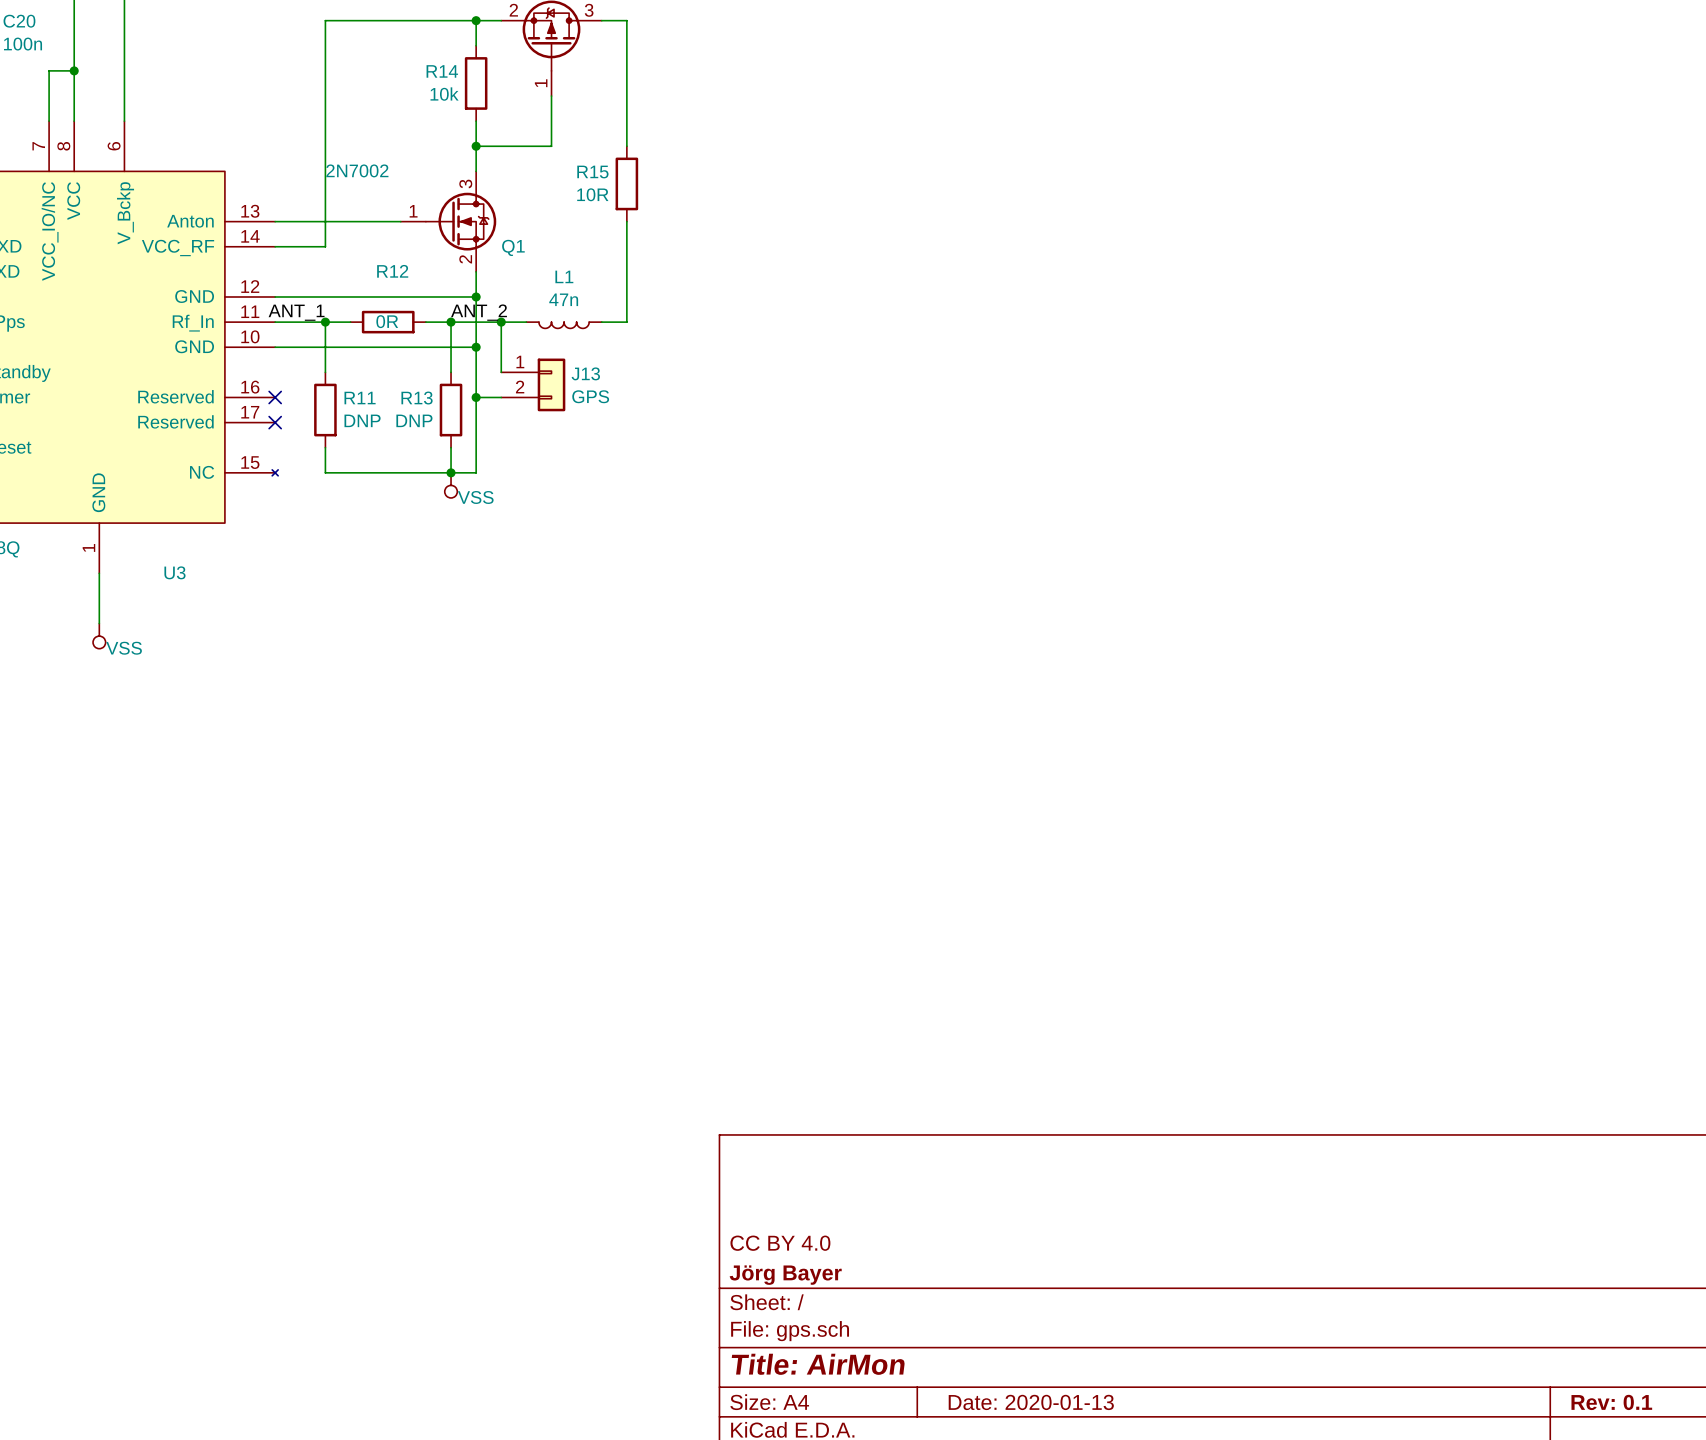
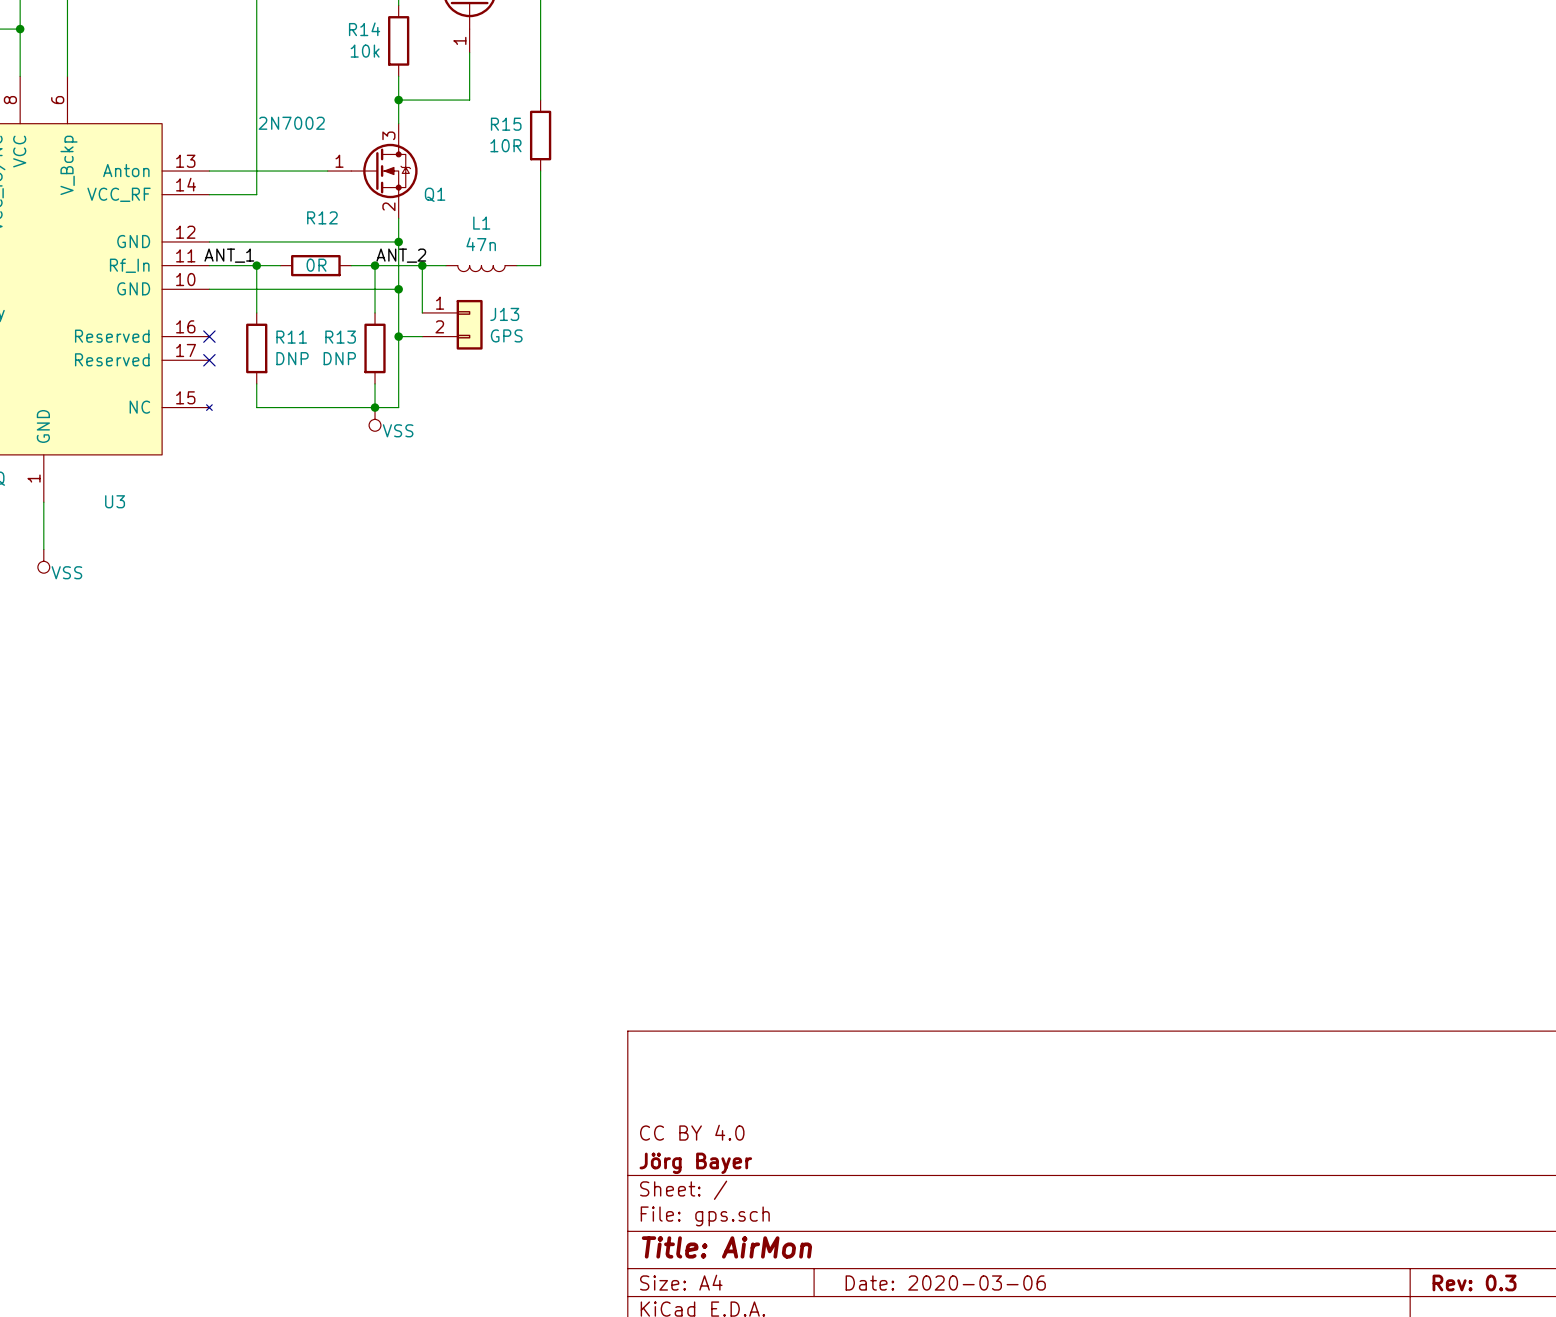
title block: Date: 2020-01-13 (1031, 1402) -> Date: 2020-03-06 (945, 1282)
title block: Rev: 0.1 (1611, 1402) -> Rev: 0.3 (1474, 1282)

